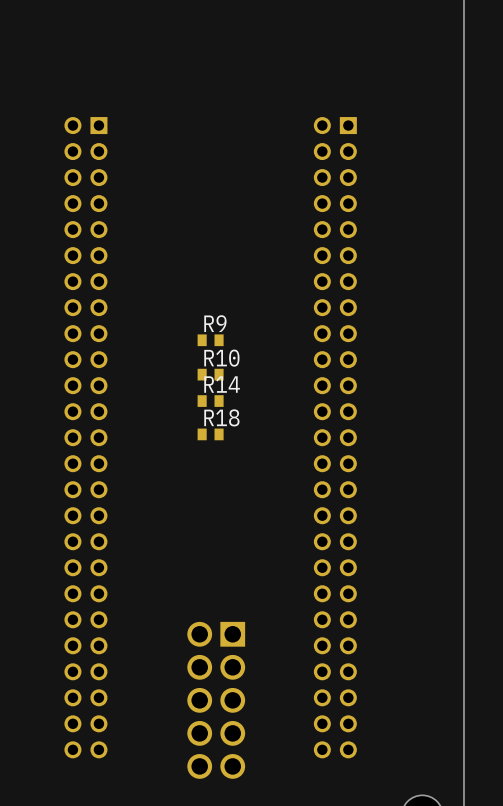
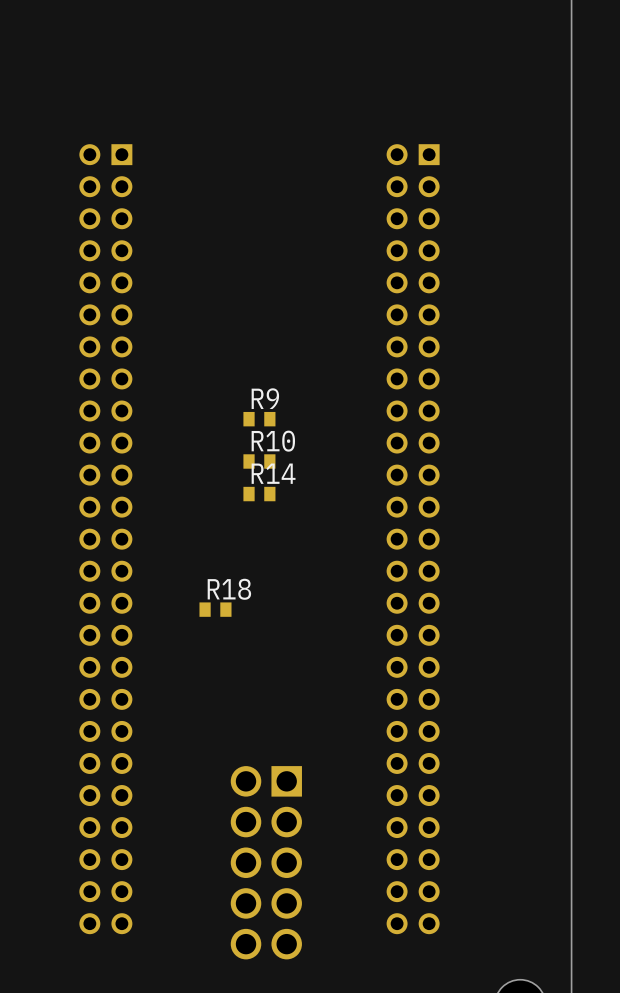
R18 position: (210, 434) -> (215, 609)

